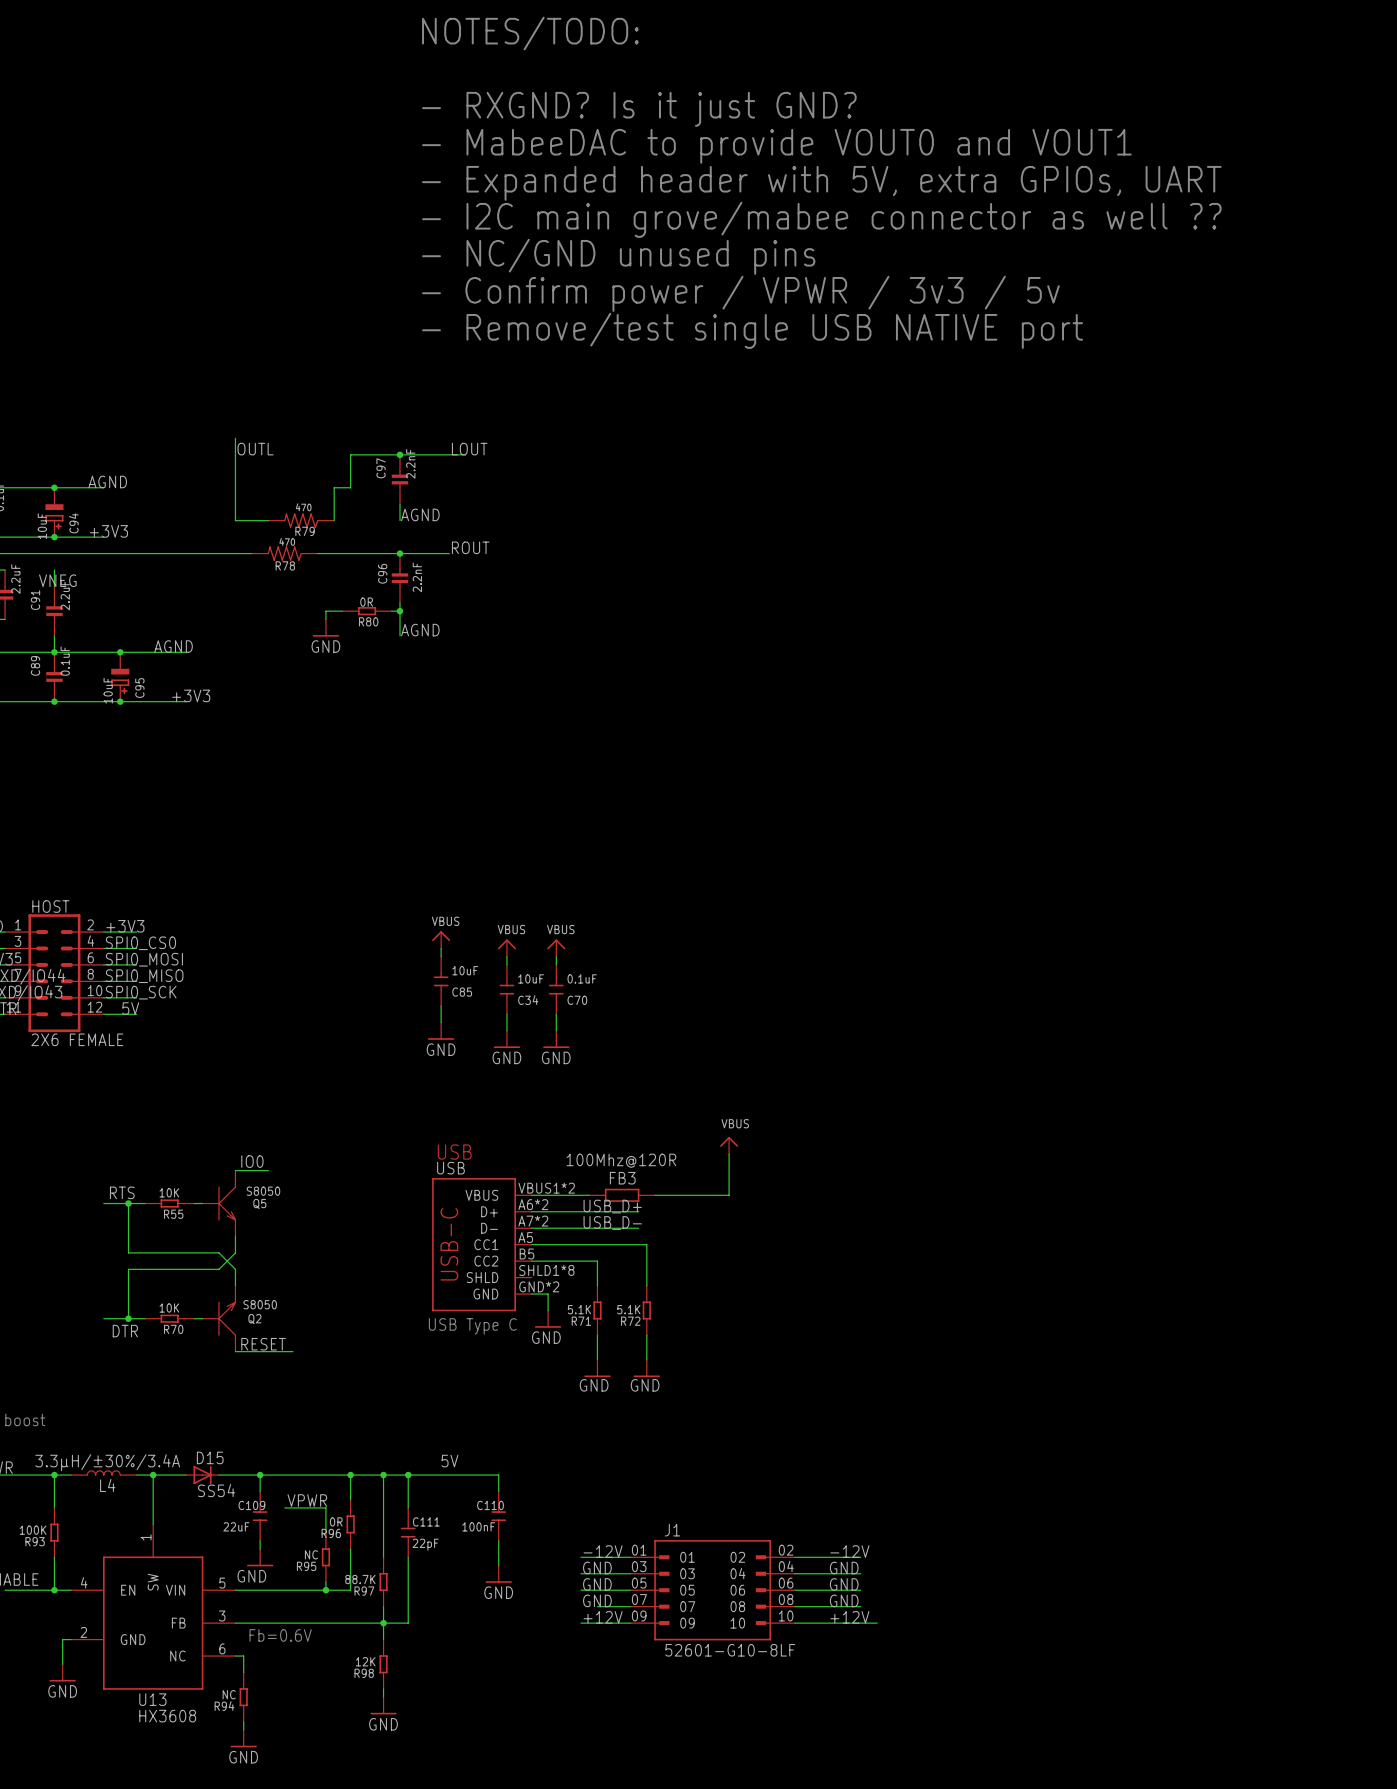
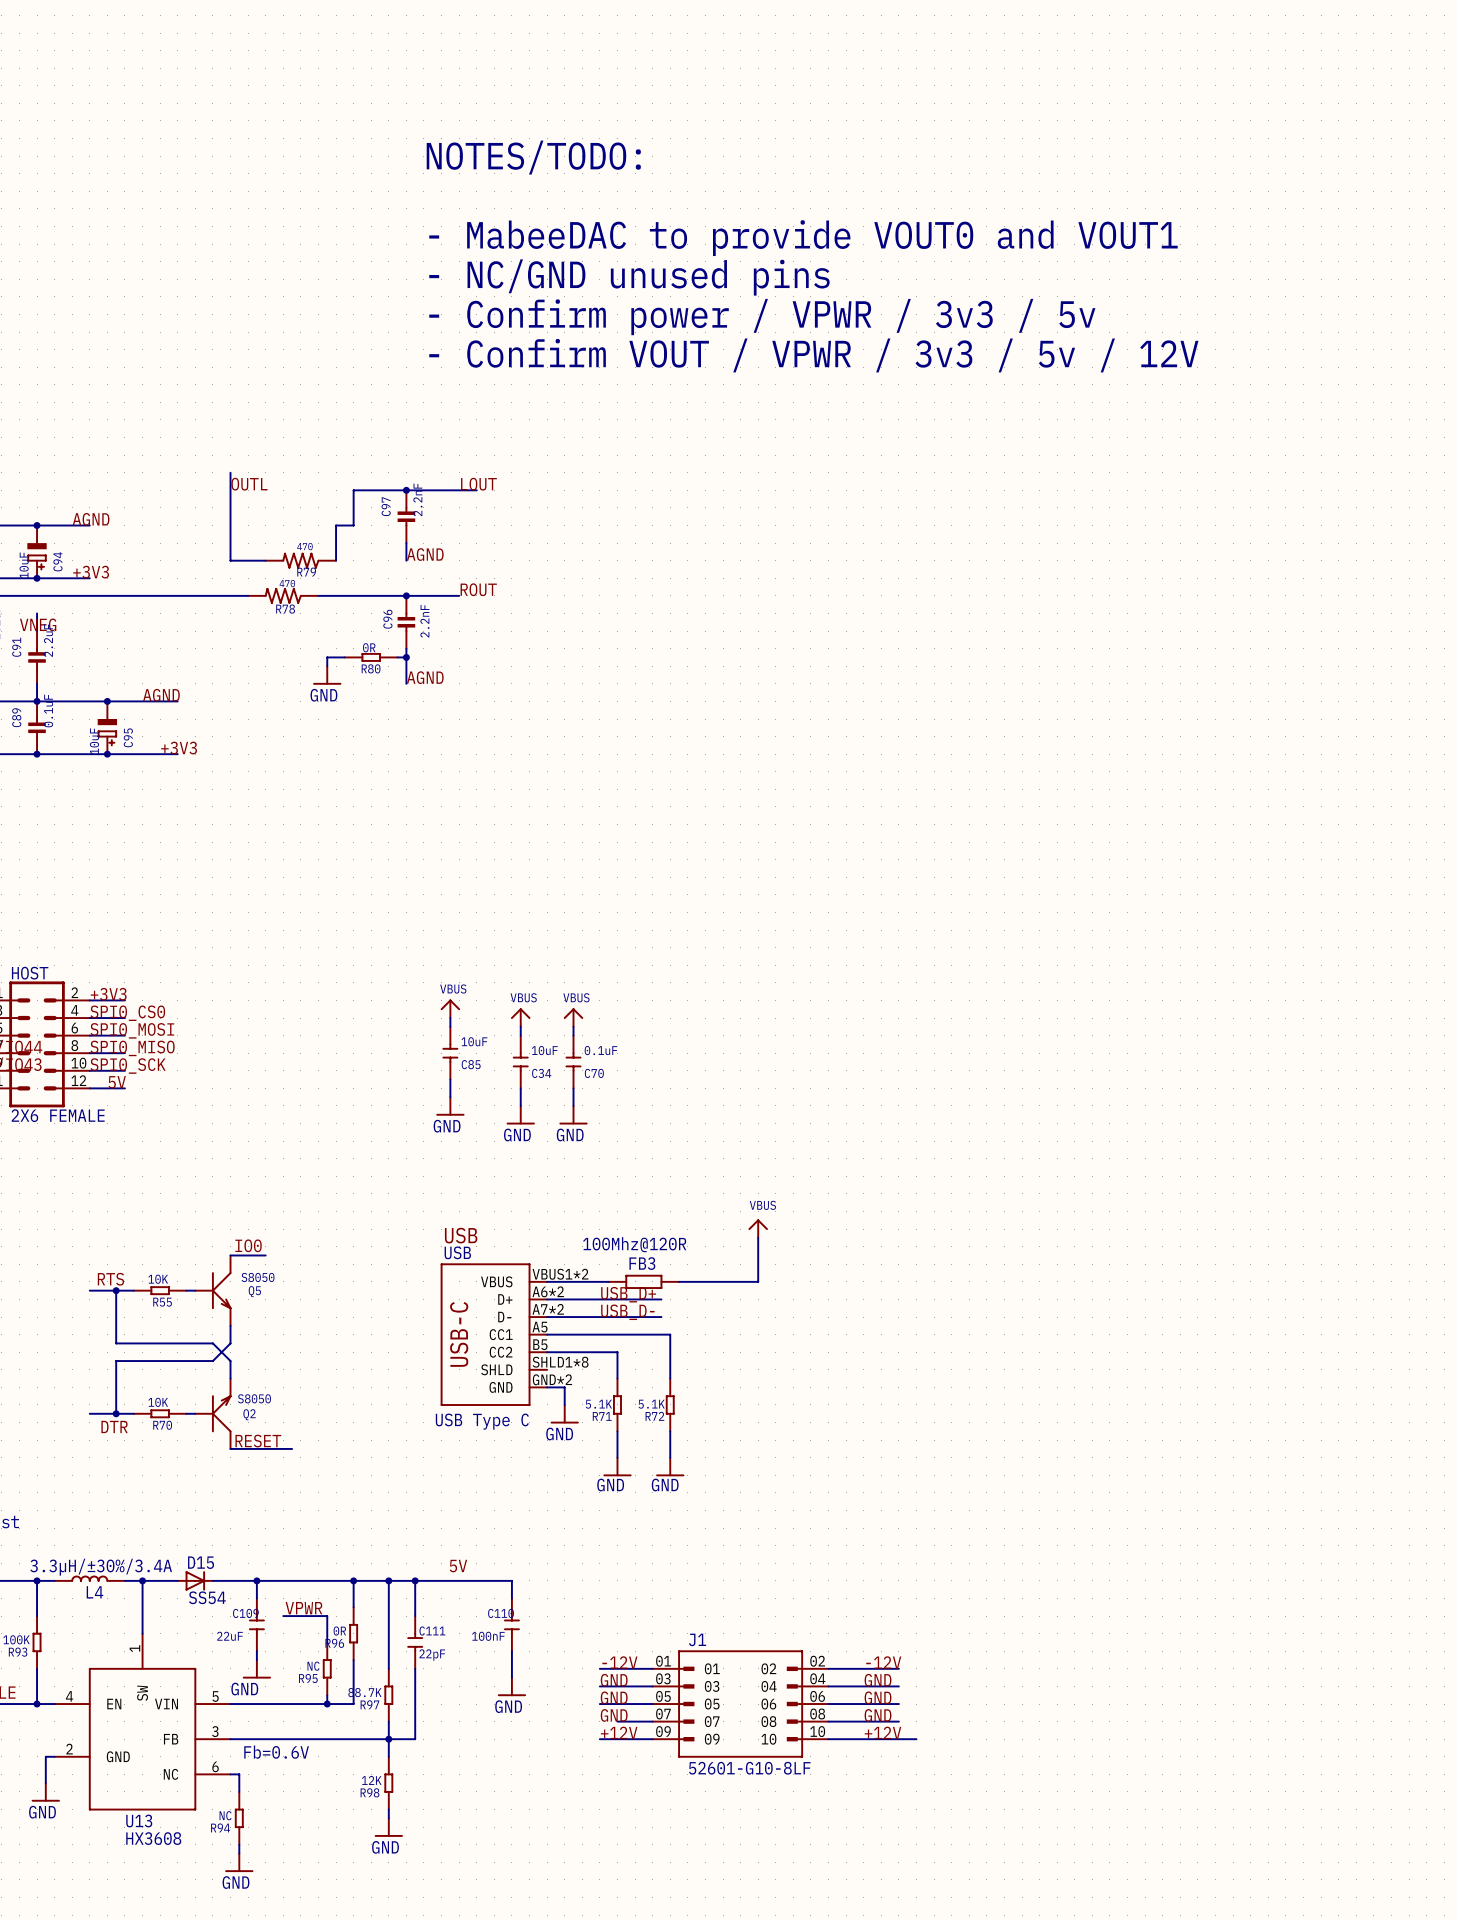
text: NOTES/TODO: (530, 33) -> none
text: - RXGND? Is it just GND? (639, 109) -> none
text: - MabeeDAC to provide VOUT0 and VOUT1 (776, 146) -> NOTES/TODO: (533, 157)
text: - Expanded header with 5V, extra GPIOs, UART (821, 183) -> none
text: - I2C main grove/mabee connector as well ?? (821, 219) -> - MabeeDAC to provide VOUT0 and VOUT1 (803, 238)
text: - Remove/test single USB NATIVE port (752, 330) -> - Confirm VOUT / VPWR / 3v3 / 5v / 12V (813, 355)

